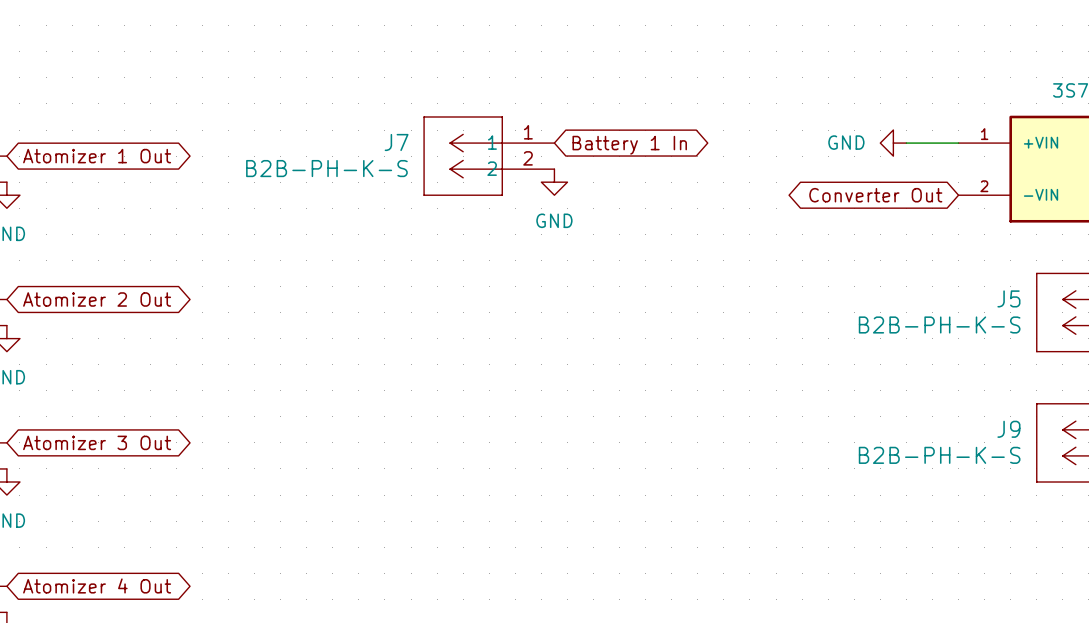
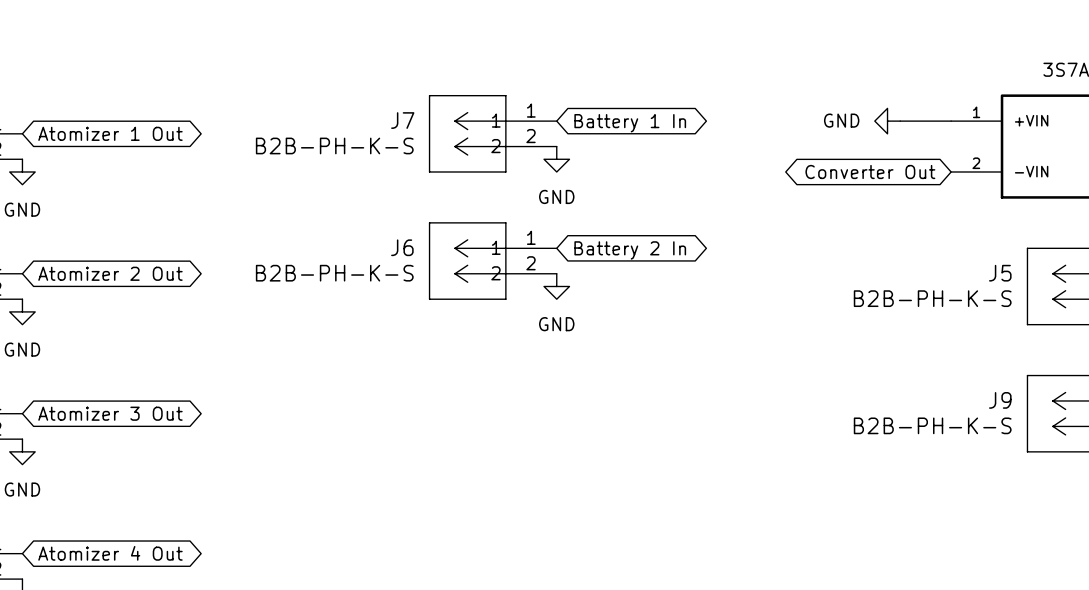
global label: none -> Battery 2 In (630, 250)
J6: none -> B2B-PH-K-S (492, 261)
power symbol: none -> GND (556, 286)

